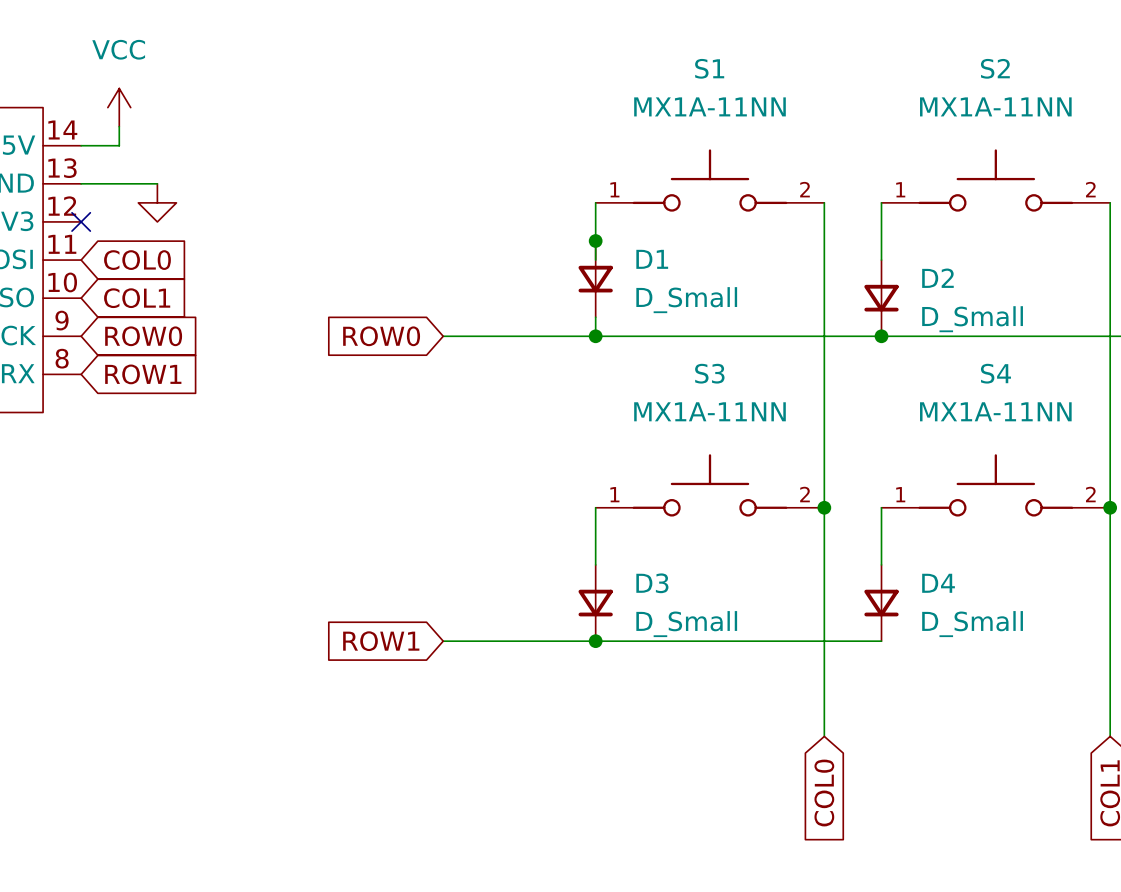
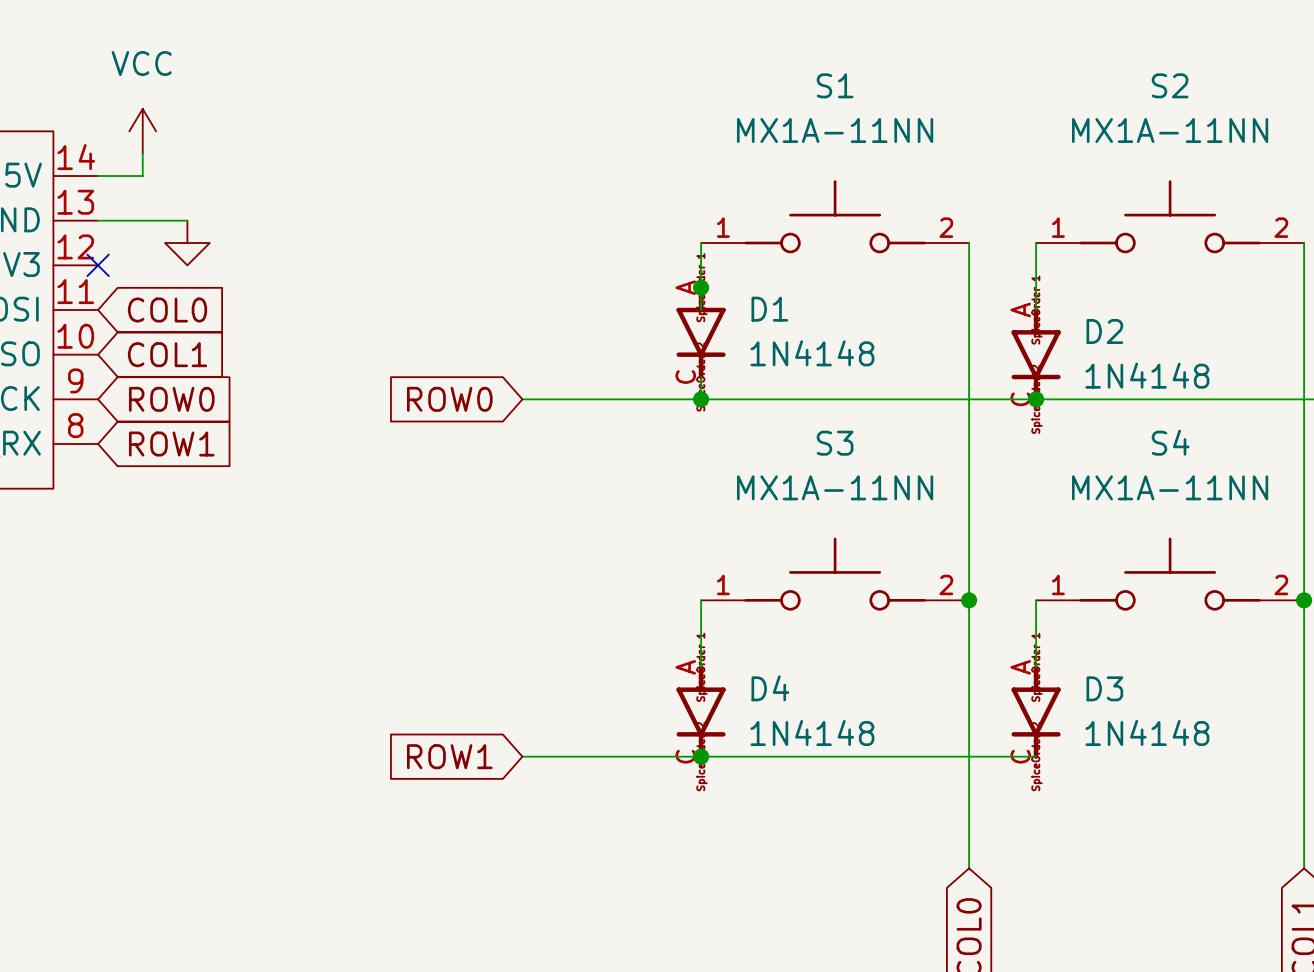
D1 symbol: [578, 241, 613, 318] -> [676, 285, 726, 380]
D2 symbol: [864, 260, 899, 337] -> [1011, 307, 1061, 402]
D1 value: D_Small (686, 300) -> 1N4148 (812, 353)
D2 value: D_Small (972, 319) -> 1N4148 (1147, 375)
D3 symbol: [578, 564, 613, 642] -> [1011, 665, 1061, 759]
D4 symbol: [864, 564, 899, 642] -> [676, 665, 726, 759]
D3 value: D_Small (686, 624) -> 1N4148 (1147, 732)
D4 value: D_Small (972, 624) -> 1N4148 (812, 732)

